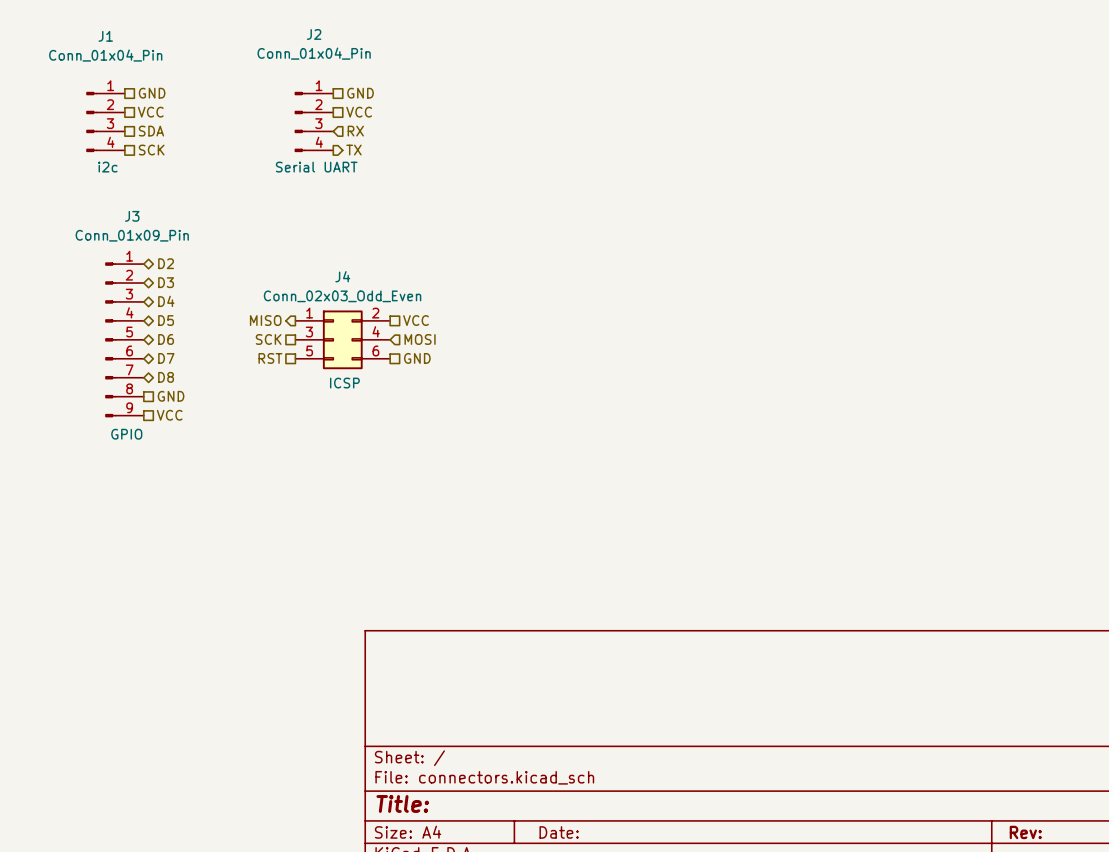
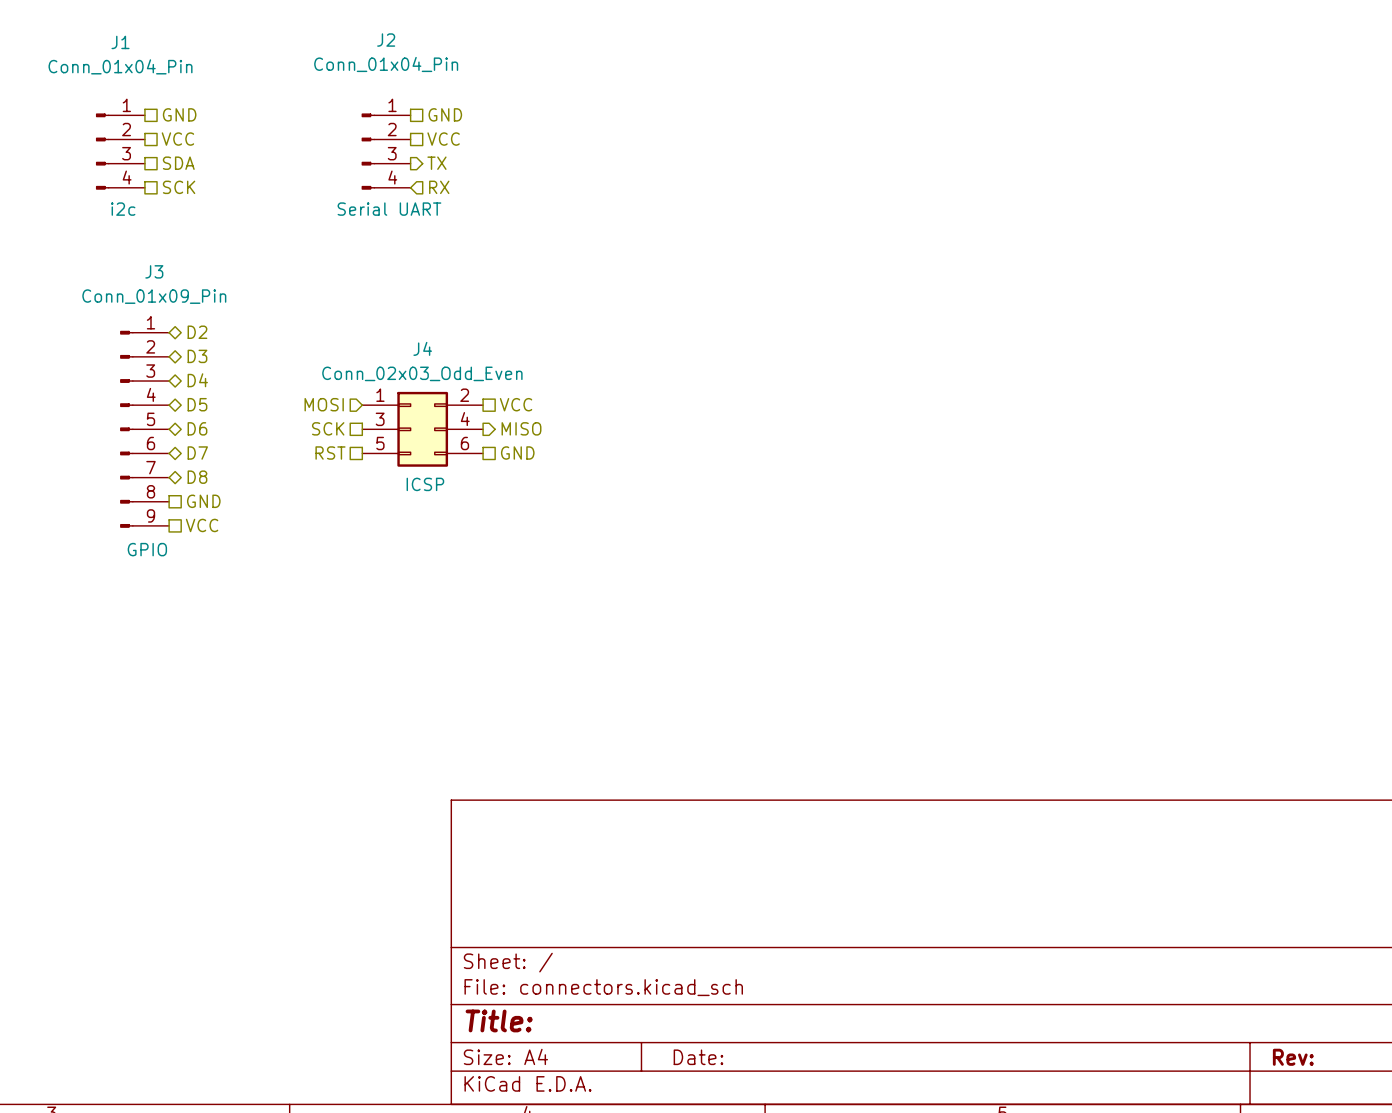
hierarchical label shape: input (355, 131) -> output (436, 163)
hierarchical label: RX (355, 131) -> TX (436, 163)
hierarchical label shape: output (353, 150) -> input (439, 187)
hierarchical label: TX (353, 150) -> RX (439, 187)
hierarchical label shape: output (265, 320) -> input (324, 404)
hierarchical label: MISO (265, 320) -> MOSI (324, 404)
hierarchical label shape: input (420, 339) -> output (521, 428)
hierarchical label: MOSI (420, 339) -> MISO (521, 428)

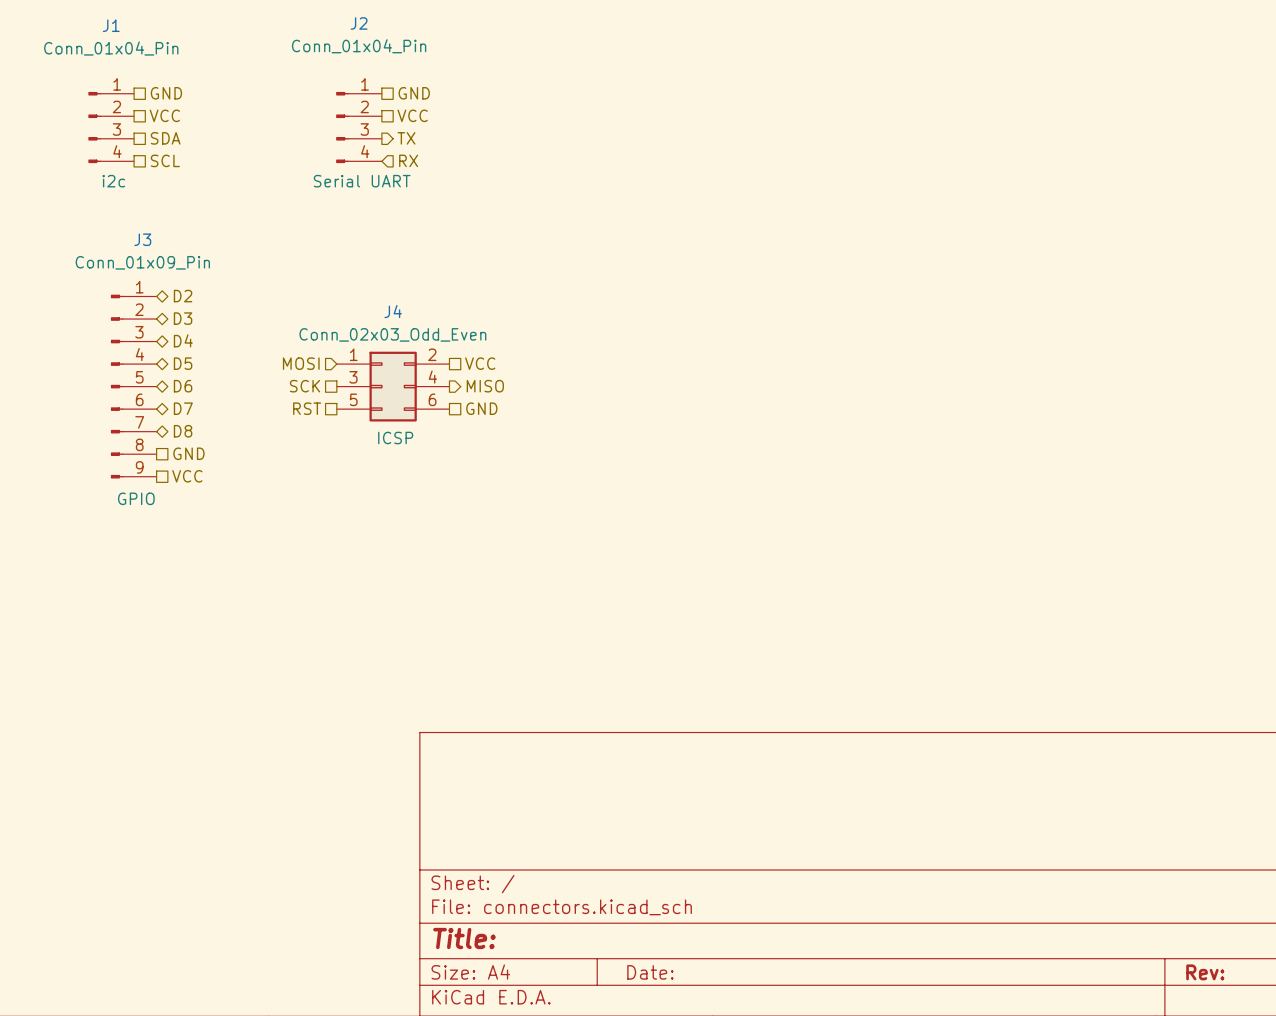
hierarchical label: SCK (179, 187) -> SCL (165, 160)

